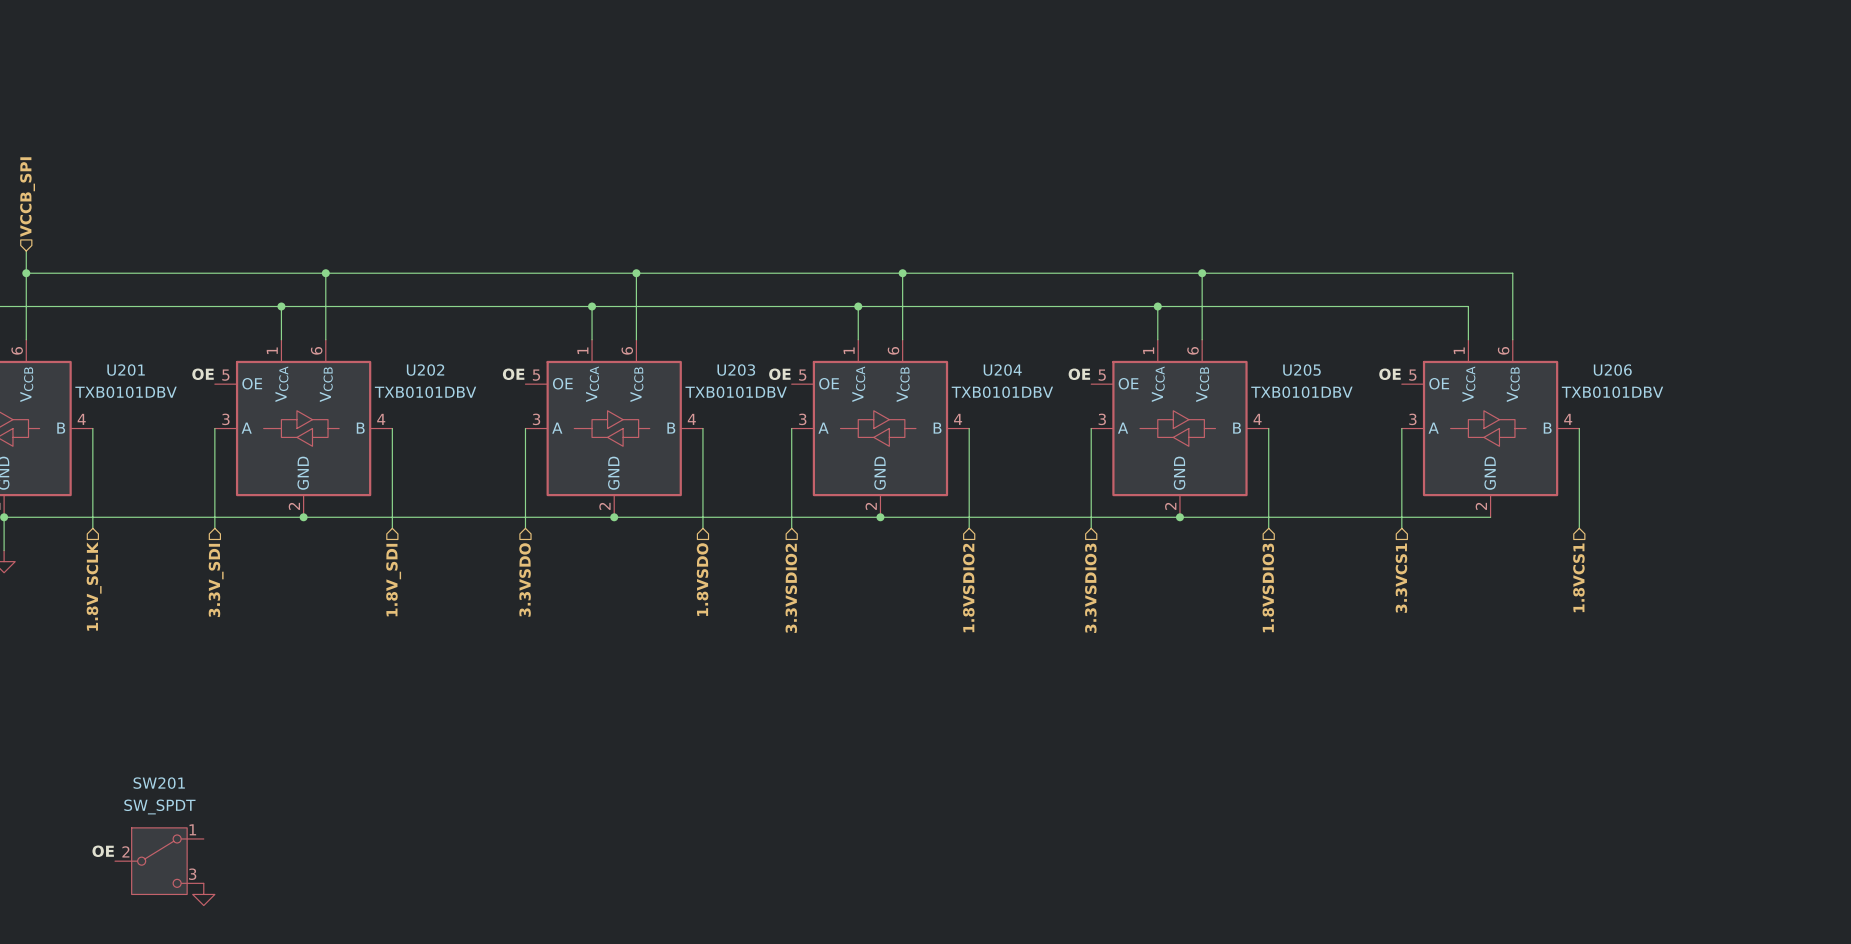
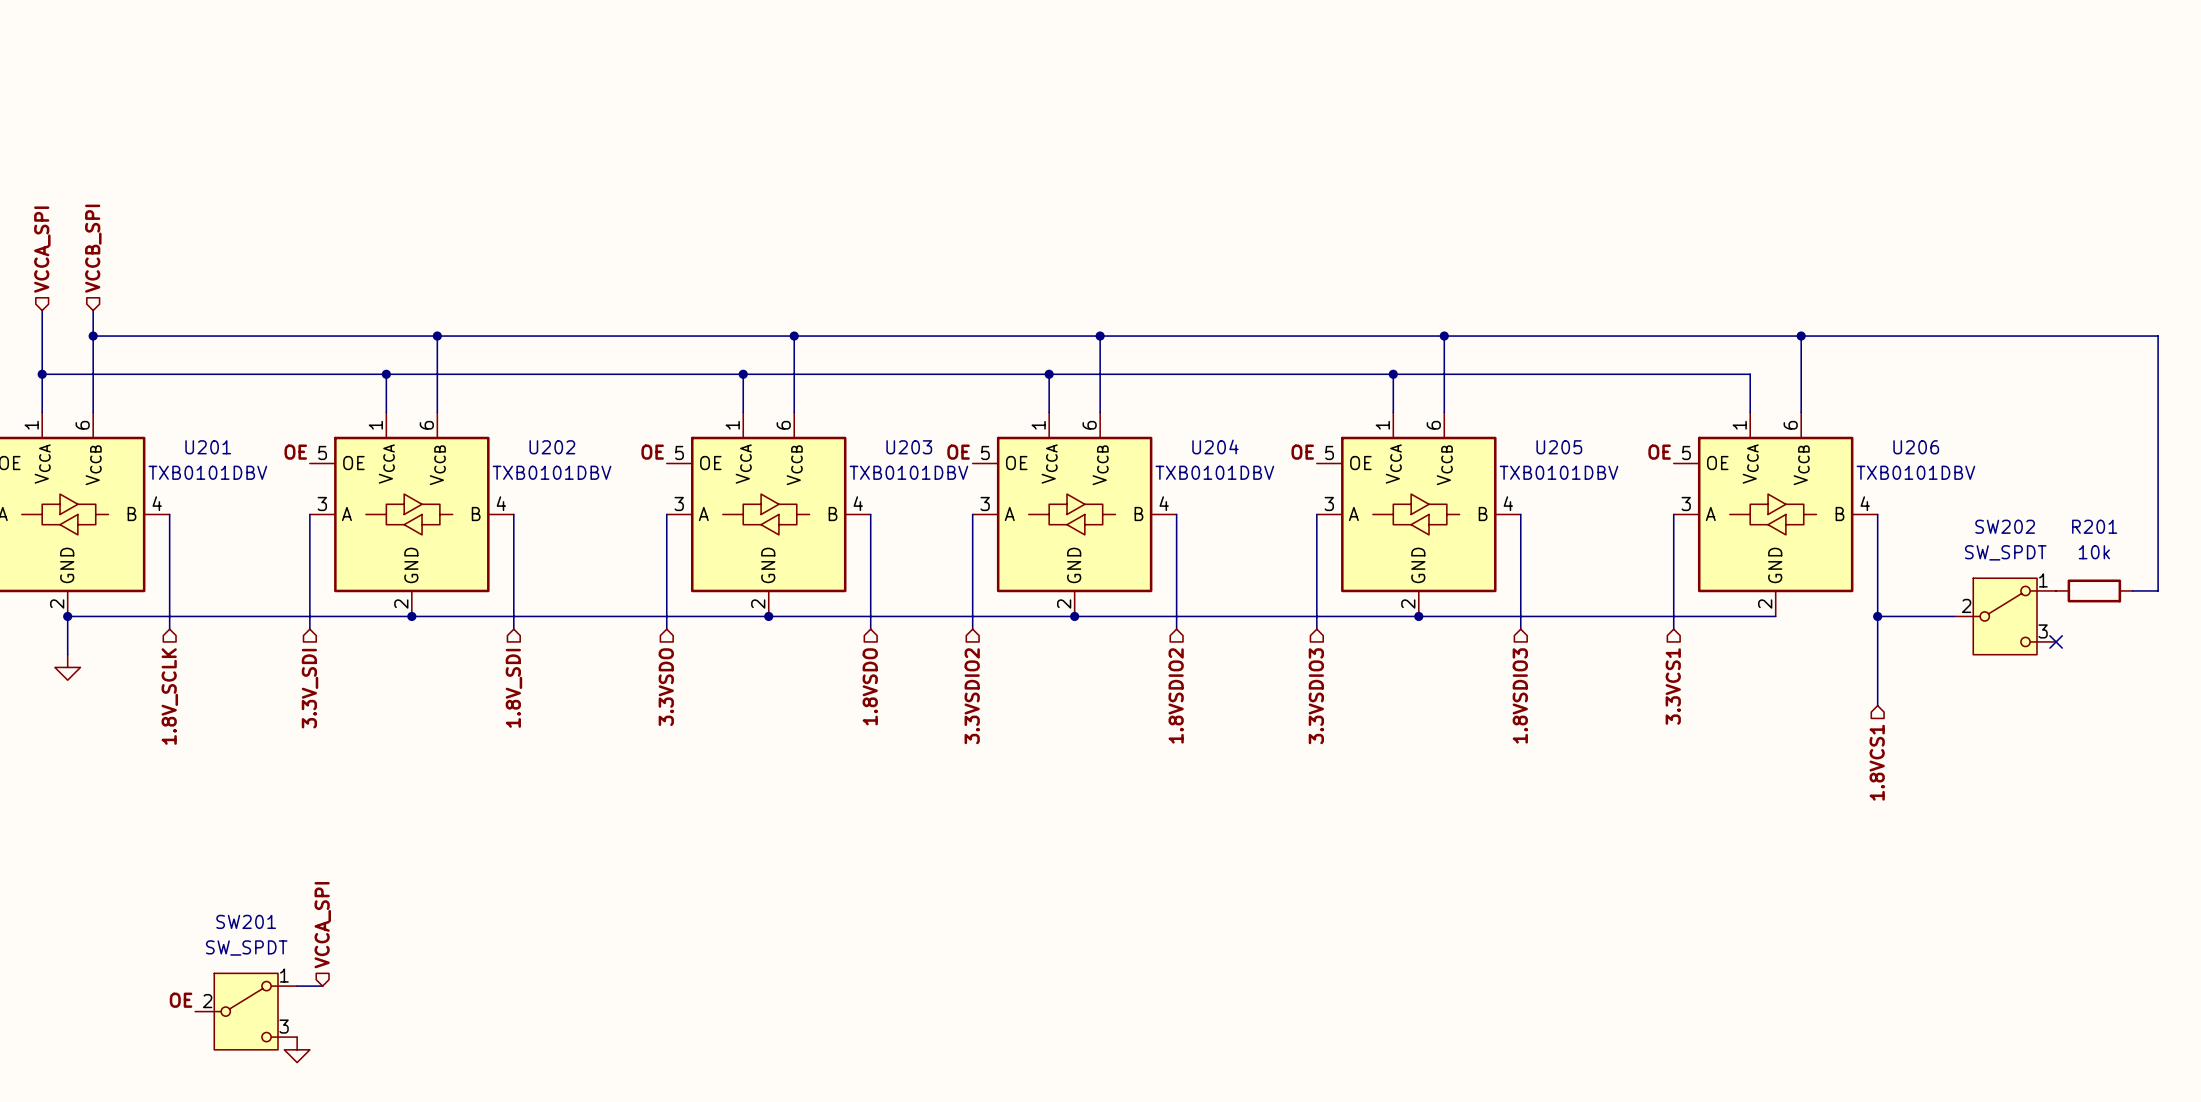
wire: none -> (1801, 336) (2158, 336) (2158, 590) (2132, 590)
junction: none -> (1801, 336)
R201: none -> 10k (2094, 590)
wire: none -> (1877, 616) (1954, 616)
junction: none -> (1877, 616)
SW202: none -> SW_SPDT (2005, 616)
wire: none -> (1877, 629) (1877, 705)
no-connect mark: none -> (2056, 641)
hierarchical label position: 1.8VCS1 (1578, 577) -> 1.8VCS1 (1877, 762)
hierarchical label: none -> VCCA_SPI (322, 925)
wire: none -> (297, 986) (322, 986)

